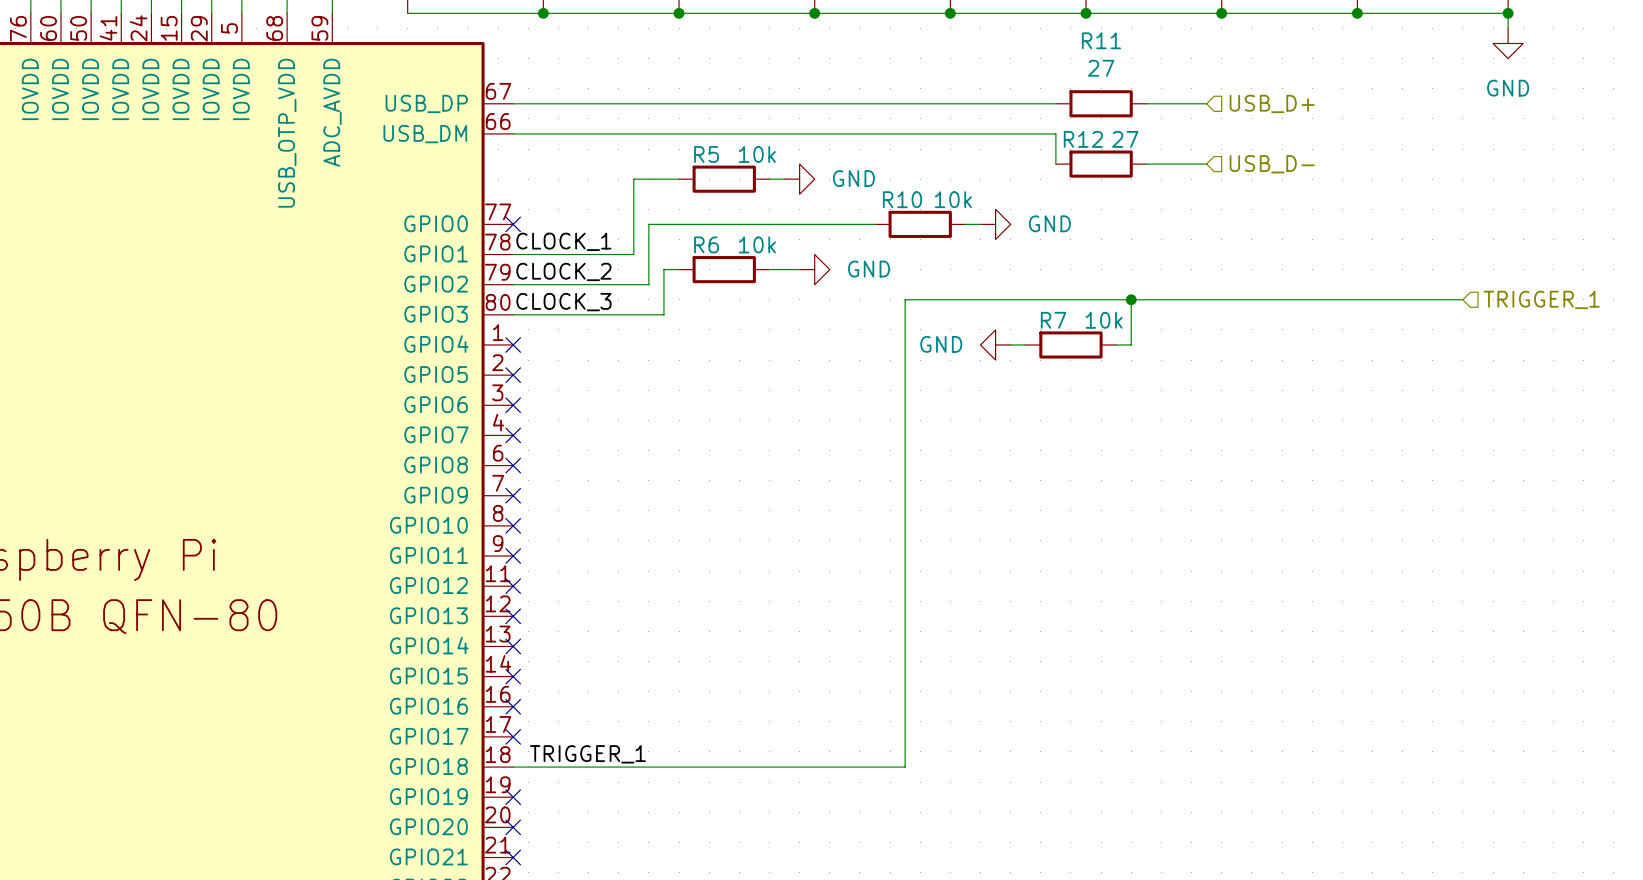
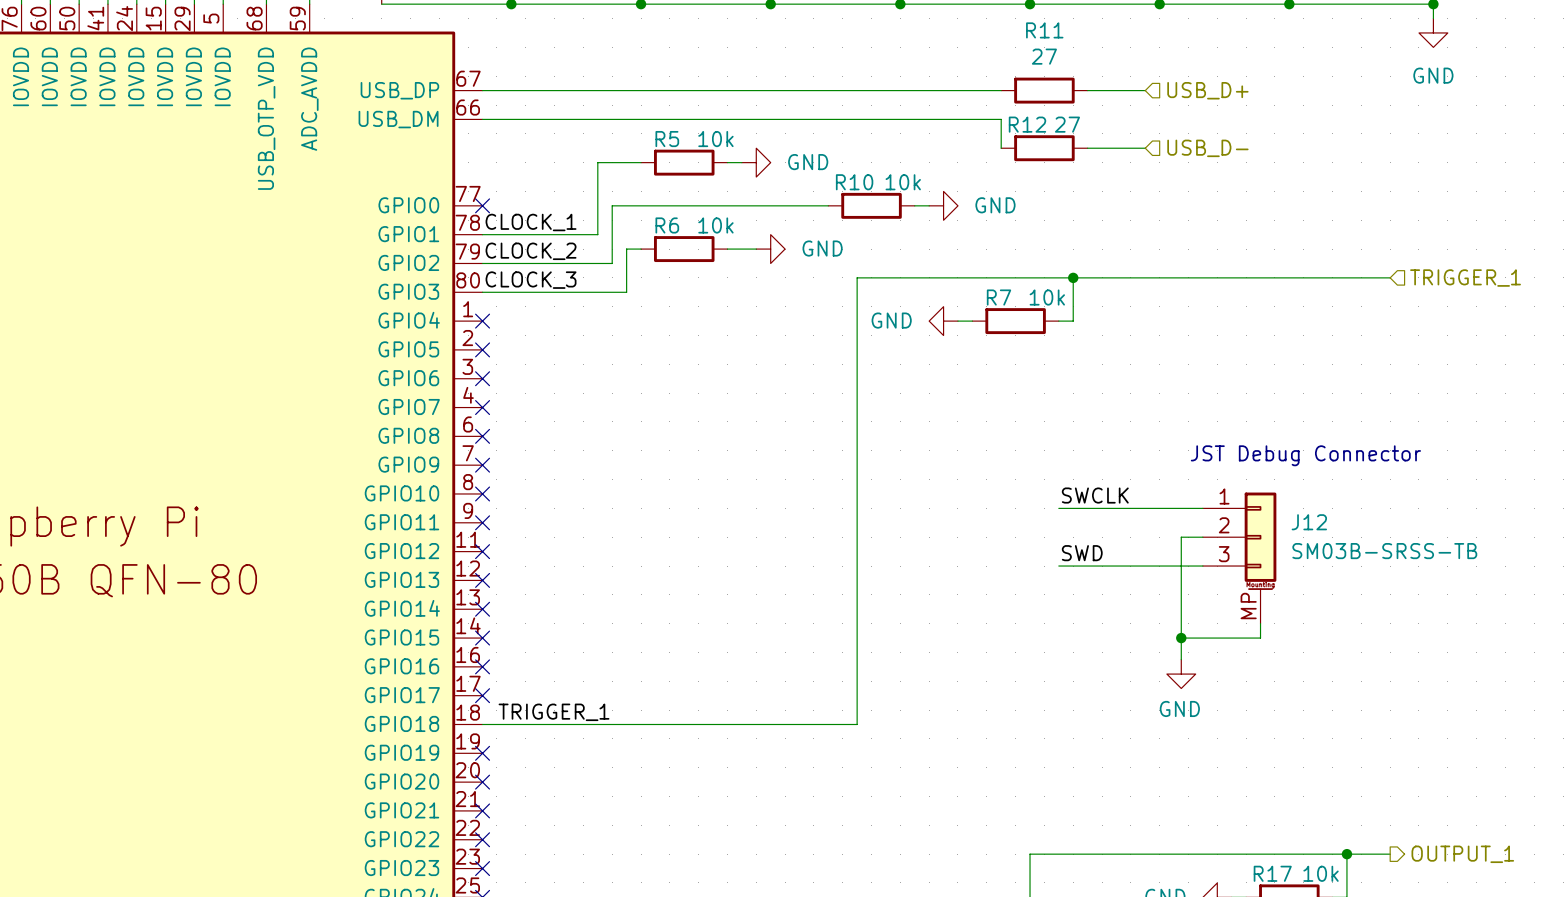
text: none -> JST Debug Connector (1305, 455)
label: none -> SWCLK (1095, 495)
wire: none -> (1058, 508) (1202, 508)
wire: none -> (1202, 537) (1181, 537) (1181, 659)
label: none -> SWD (1082, 553)
J12: none -> SM03B-SRSS-TB (1239, 558)
wire: none -> (1058, 566) (1202, 566)
wire: none -> (1260, 623) (1260, 638) (1181, 638)
junction: none -> (1181, 638)
power symbol: none -> GND (1181, 674)

